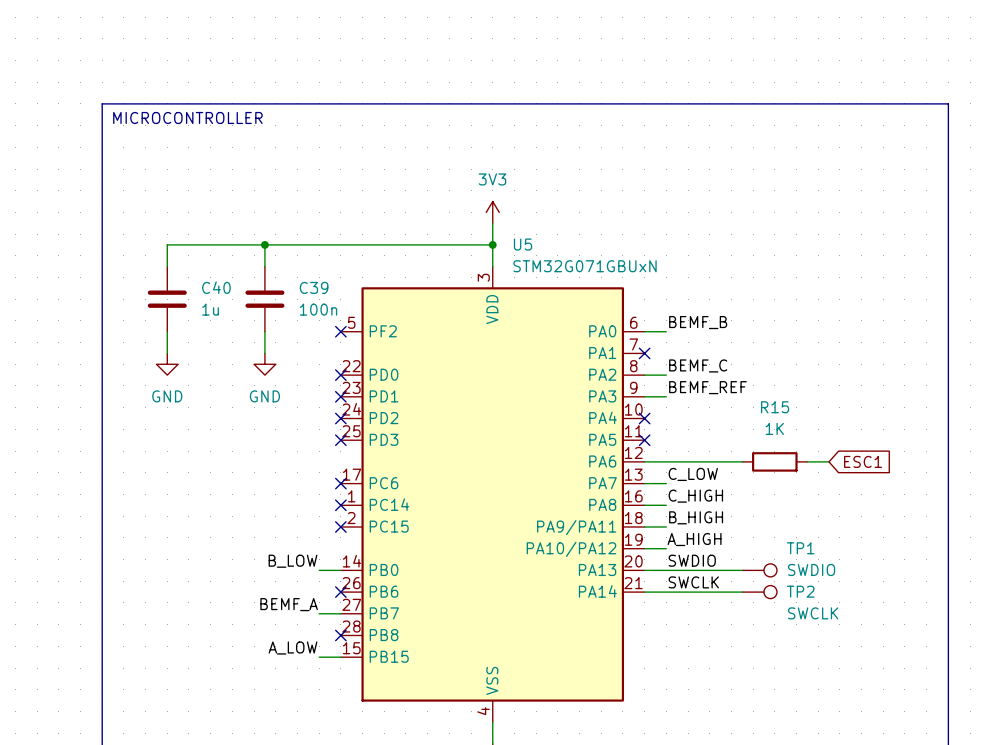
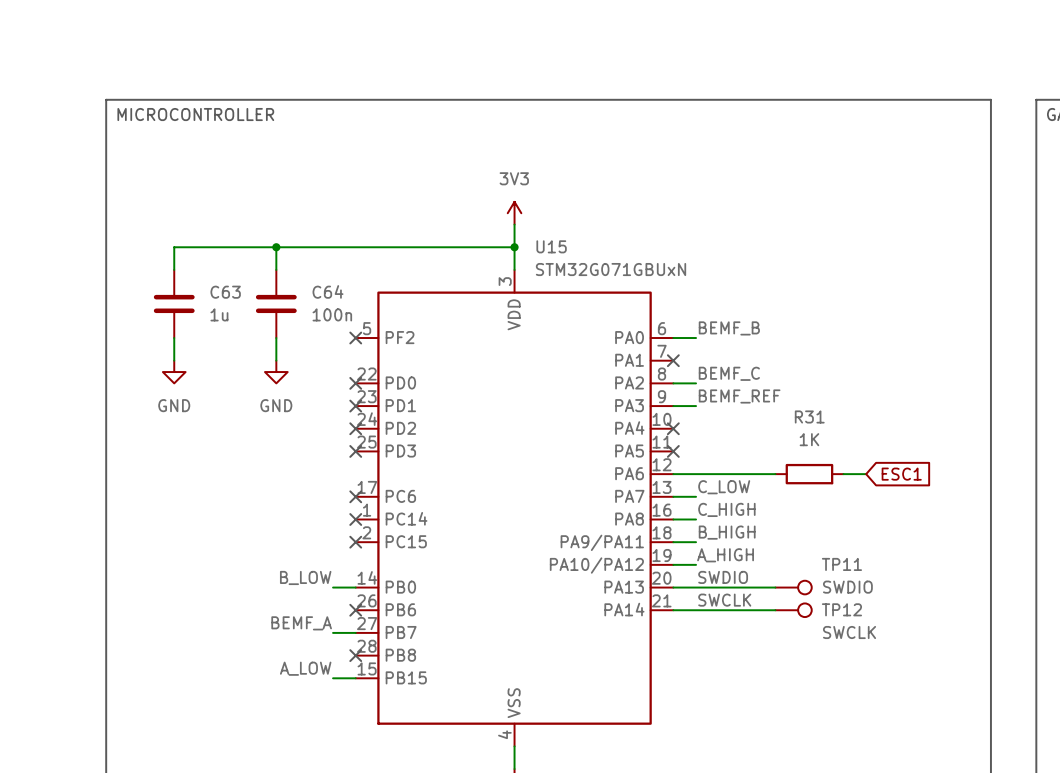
U5 name: U5 (523, 244) -> U15 (551, 246)
C40 name: C40 (216, 287) -> C63 (225, 292)
C39 name: C39 (314, 287) -> C64 (328, 291)
R15 name: R15 (775, 407) -> R31 (809, 416)
TP1 name: TP1 (800, 548) -> TP11 (841, 564)
TP2 name: TP2 (800, 591) -> TP12 (841, 609)

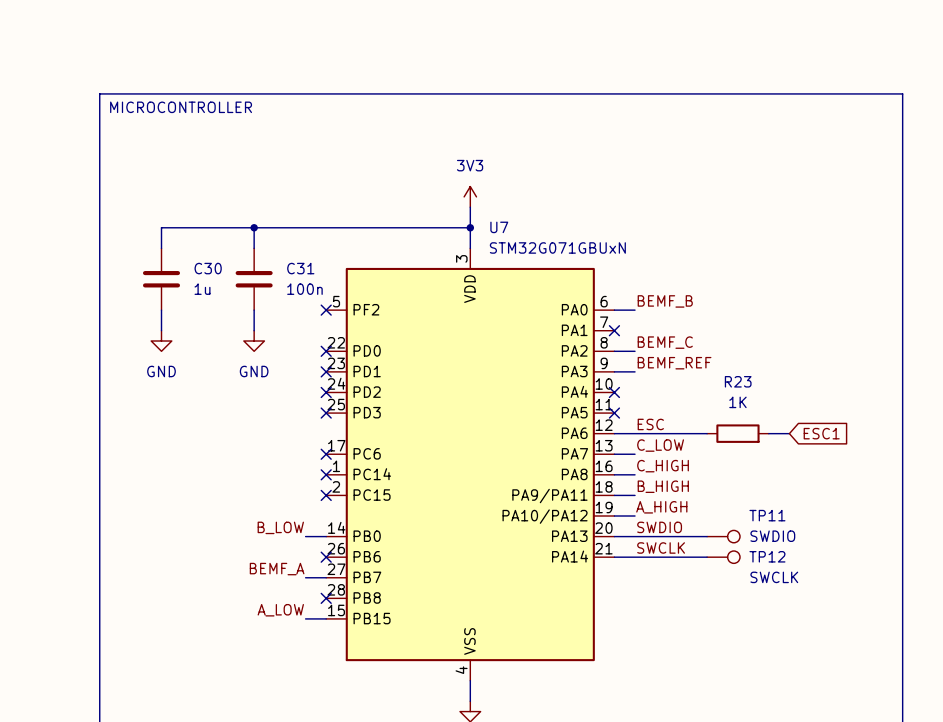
U15 name: U15 (551, 246) -> U7 (499, 227)
C64 name: C64 (328, 291) -> C31 (300, 268)
C63 name: C63 (225, 292) -> C30 (208, 268)
R31 name: R31 (809, 416) -> R23 (738, 381)
label: none -> ESC (650, 424)

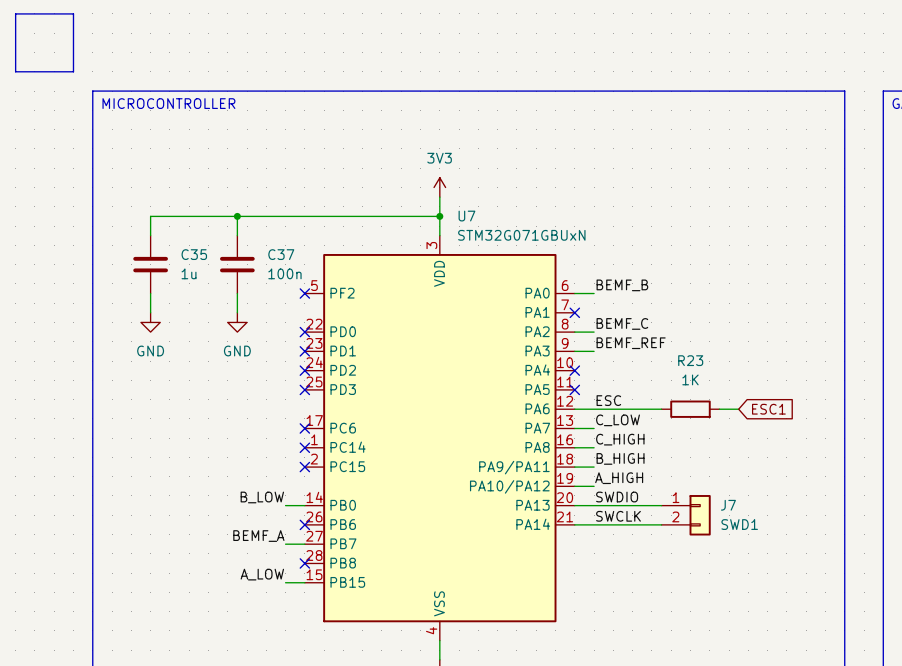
line: none -> (15, 13) (73, 13) (73, 71) (15, 71) (15, 13)
C30 name: C30 (208, 268) -> C35 (194, 254)
C31 name: C31 (300, 268) -> C37 (281, 254)
TP11: SWDIO (723, 536) -> none
J7: none -> SWD1 (686, 515)
TP12: SWCLK (723, 557) -> none

